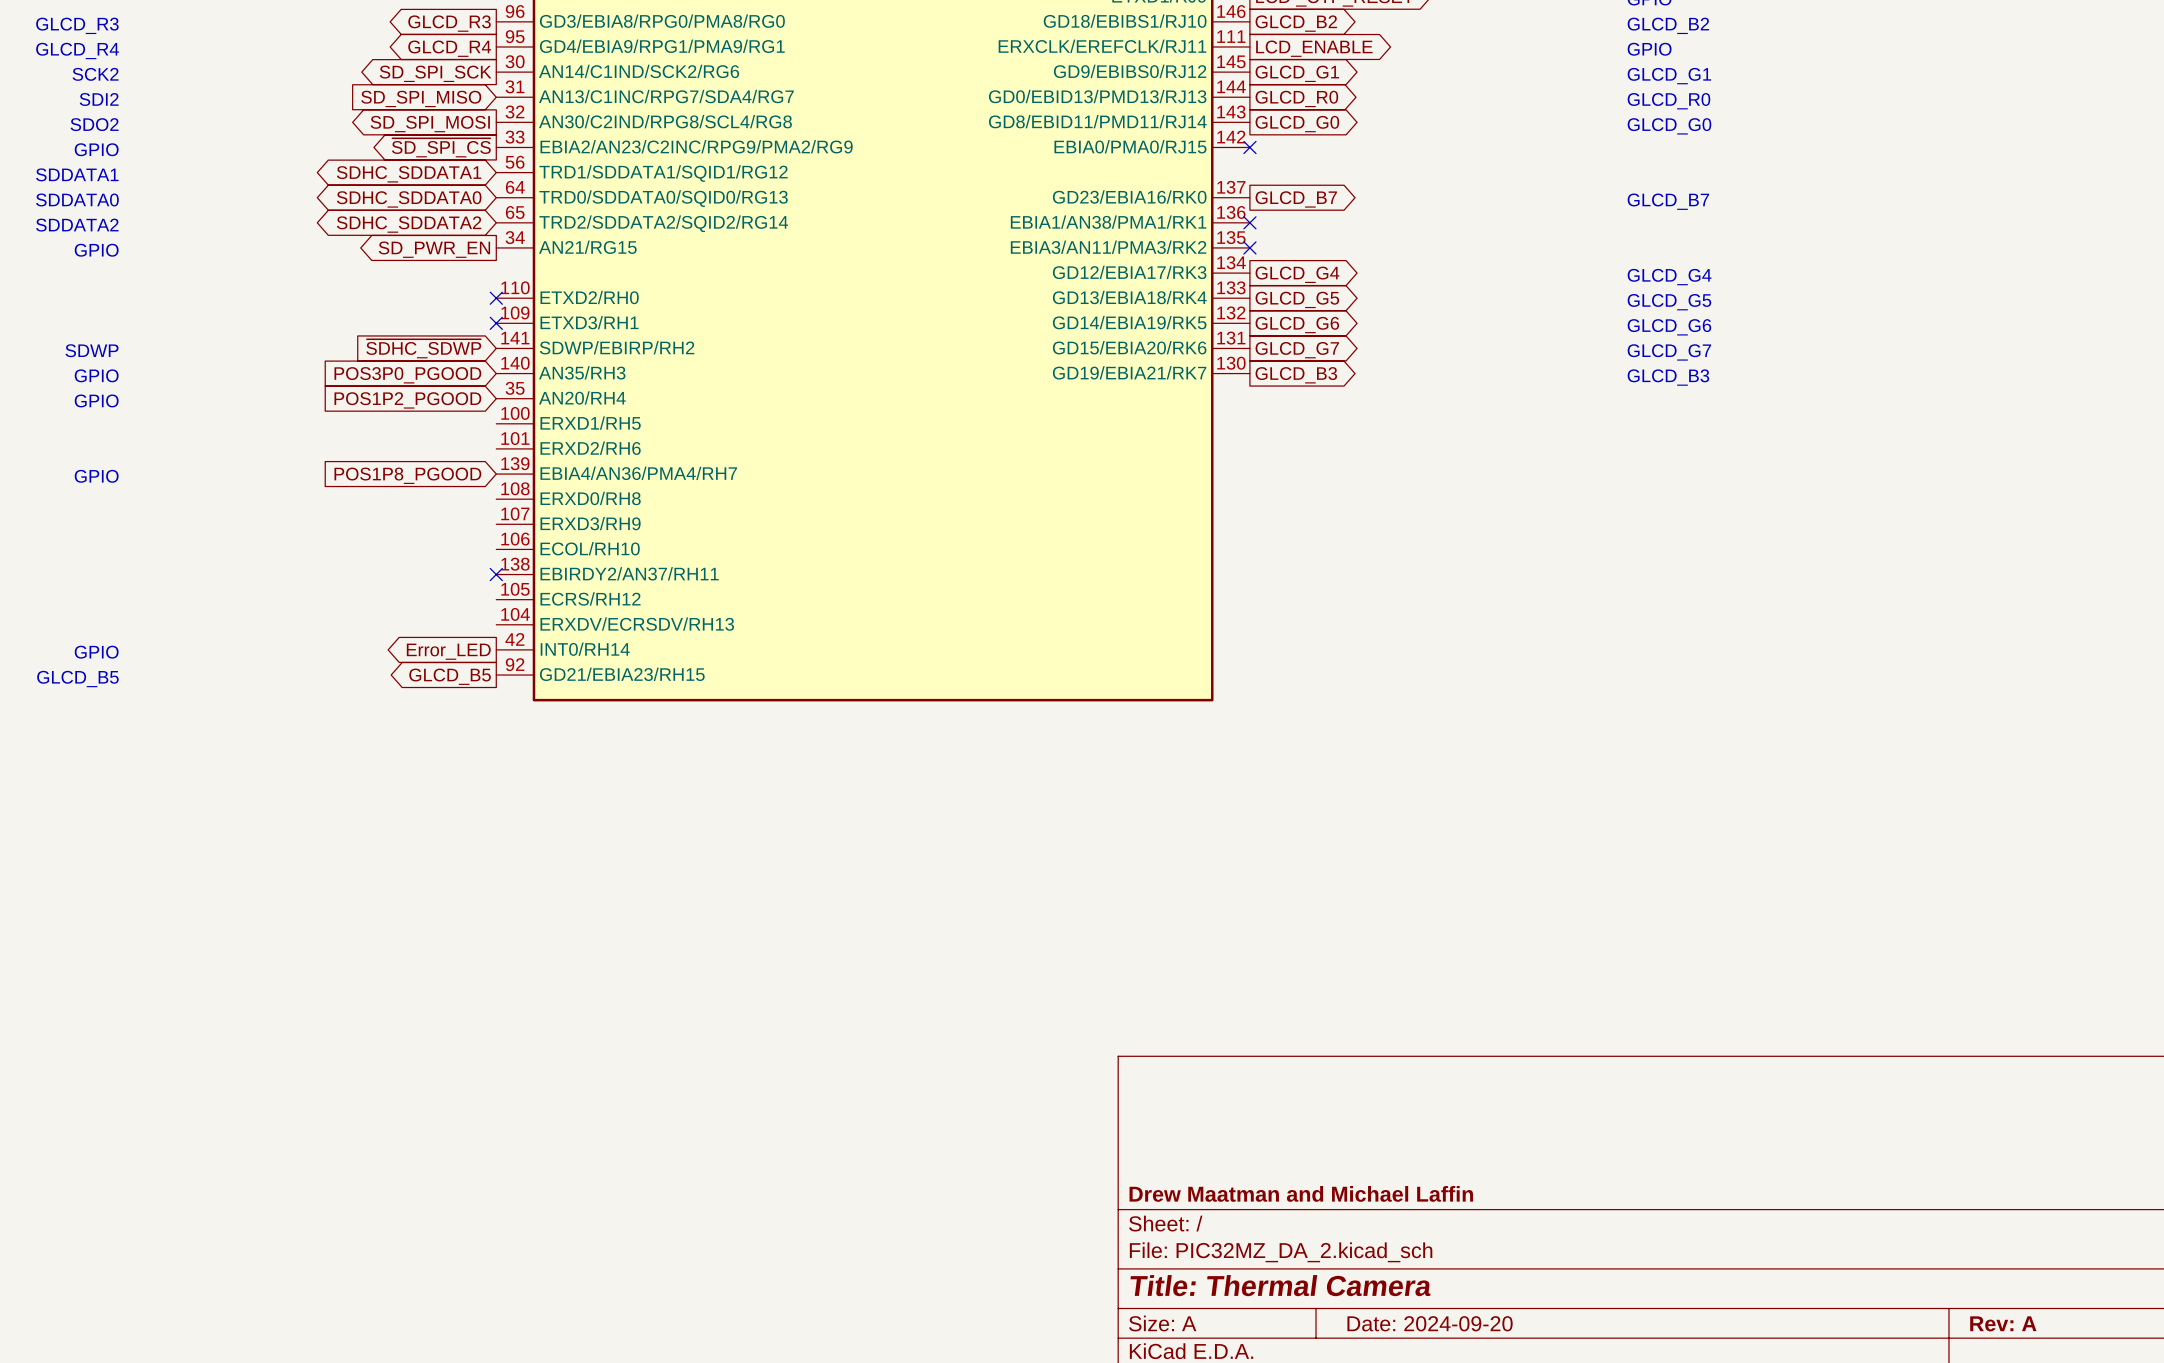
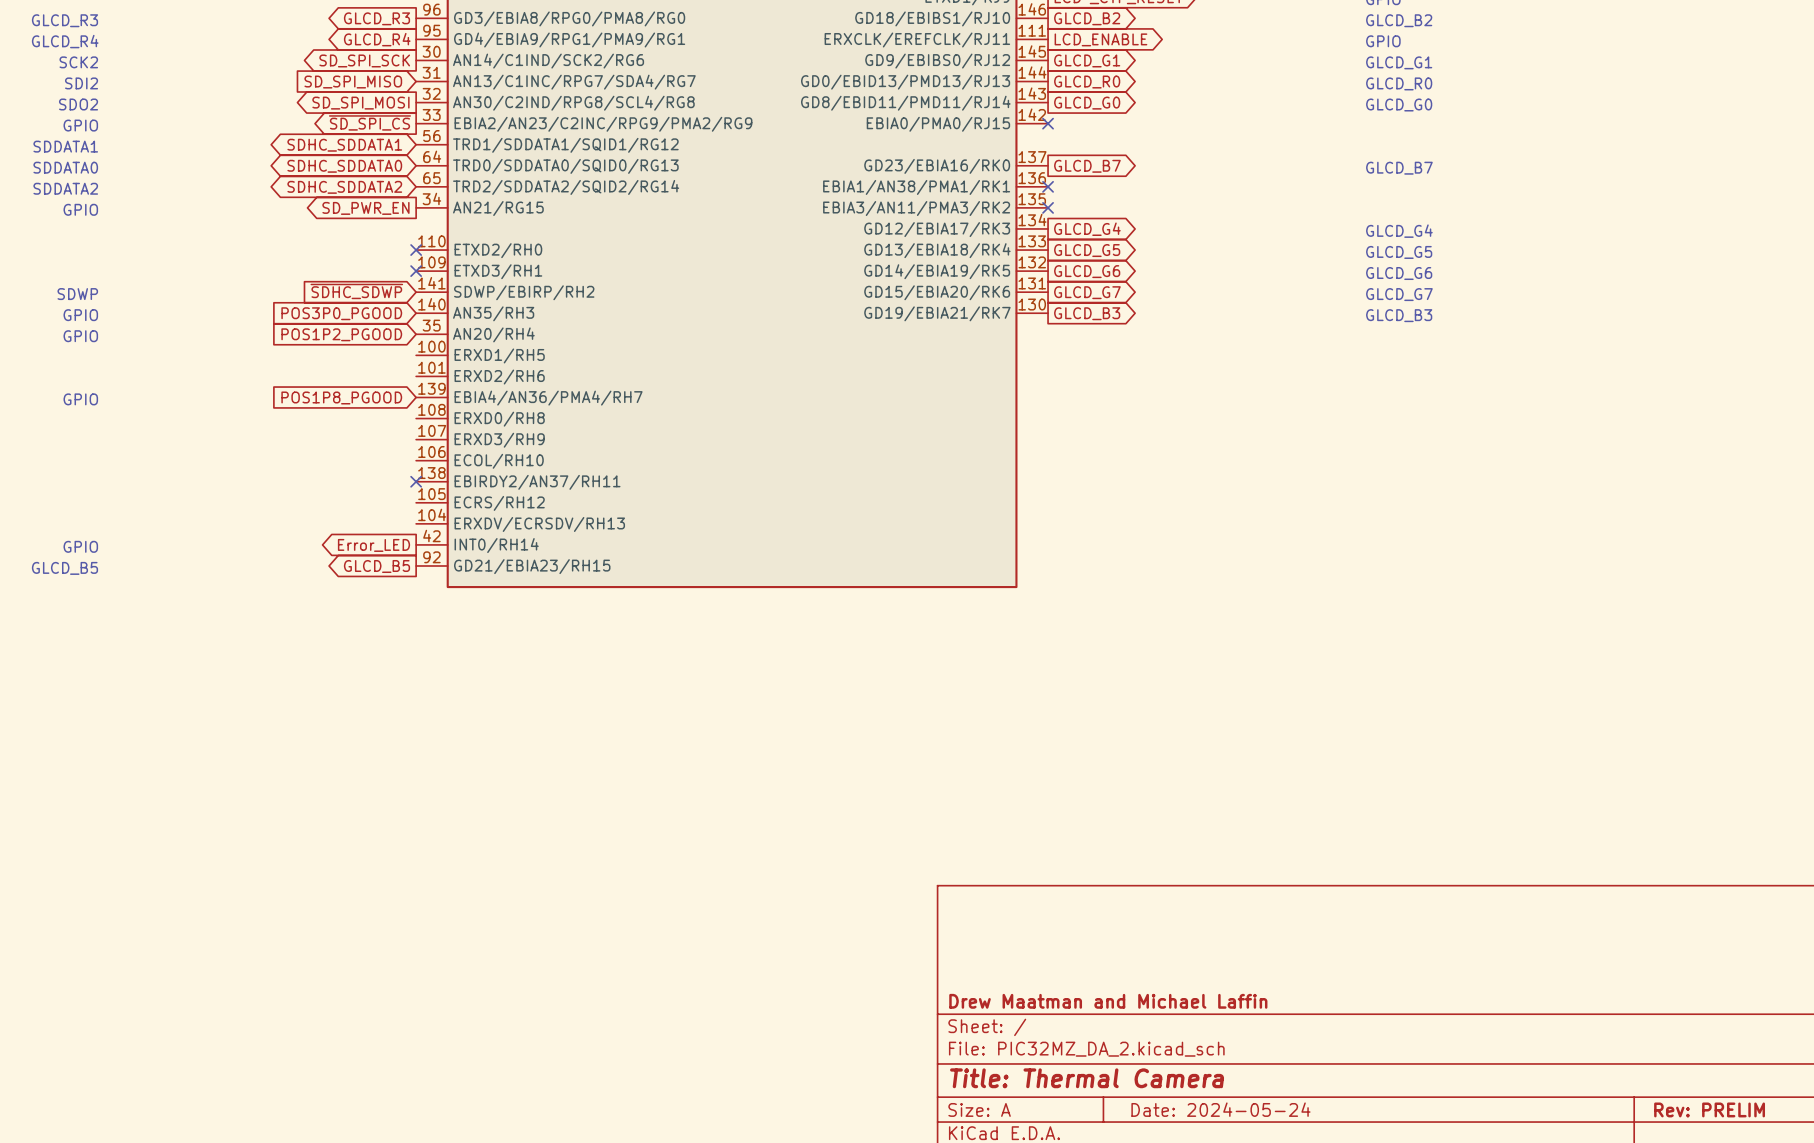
title block: Date: 2024-09-20 (1430, 1323) -> Date: 2024-05-24 (1220, 1109)
title block: Rev: A (2003, 1323) -> Rev: PRELIM (1709, 1109)

